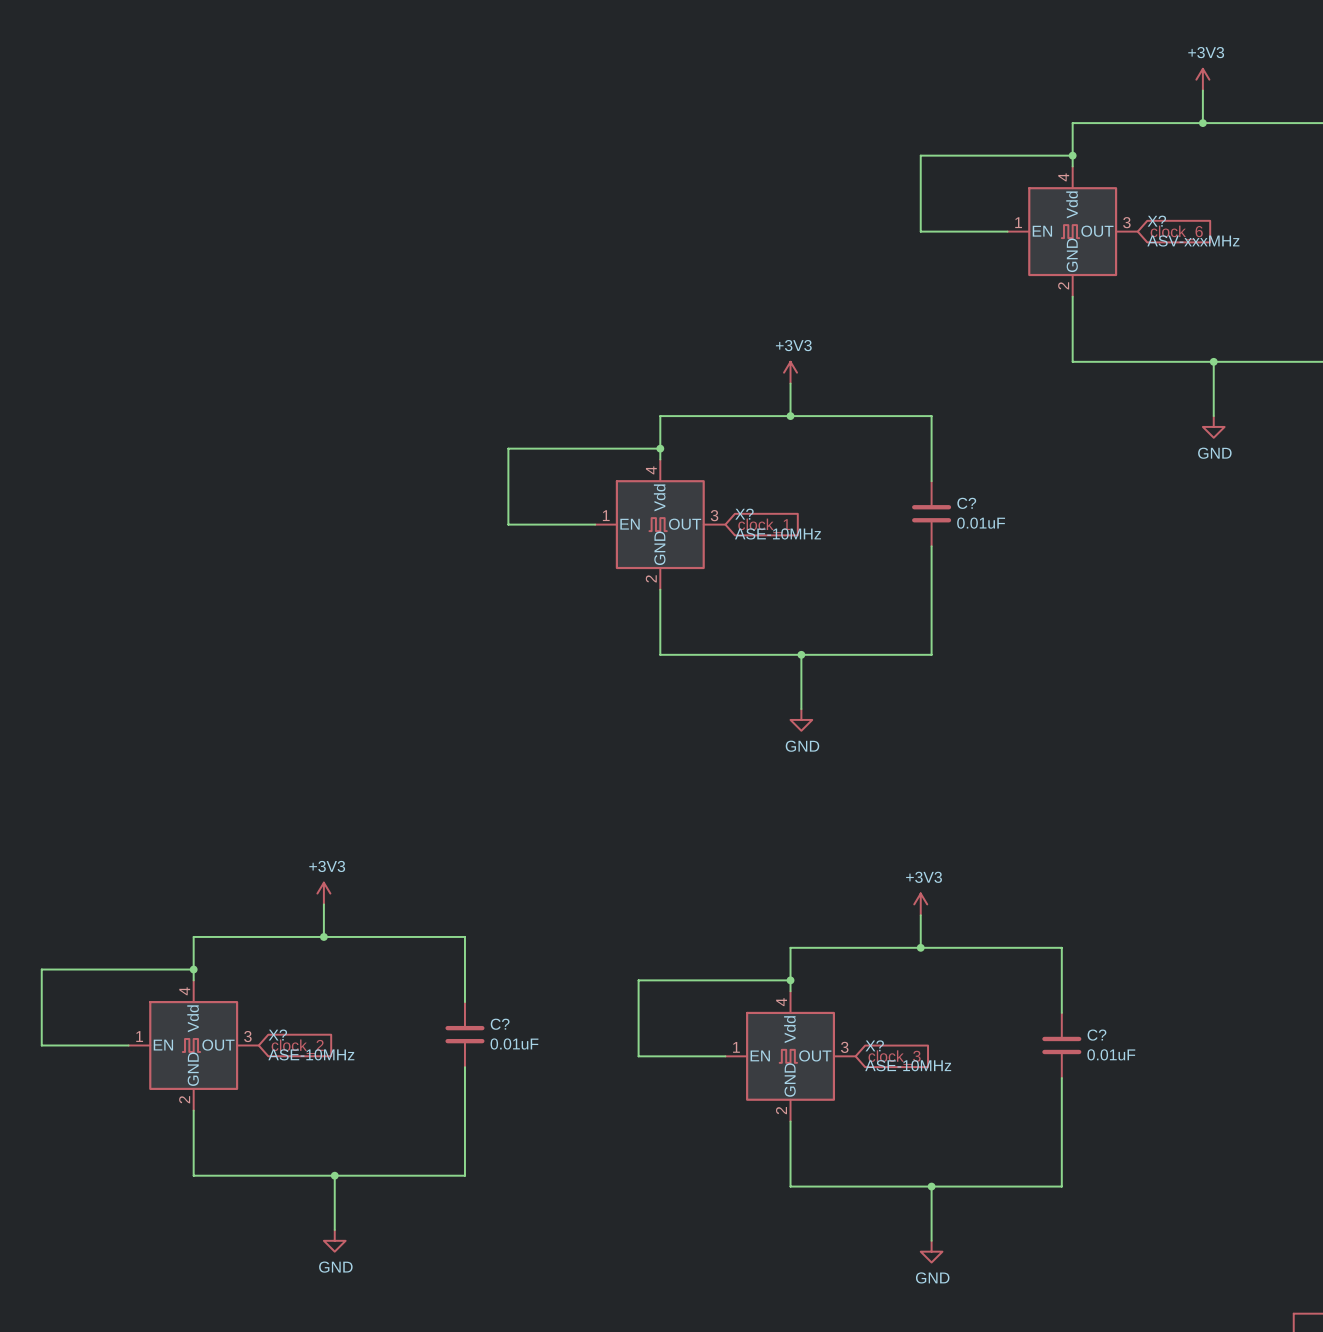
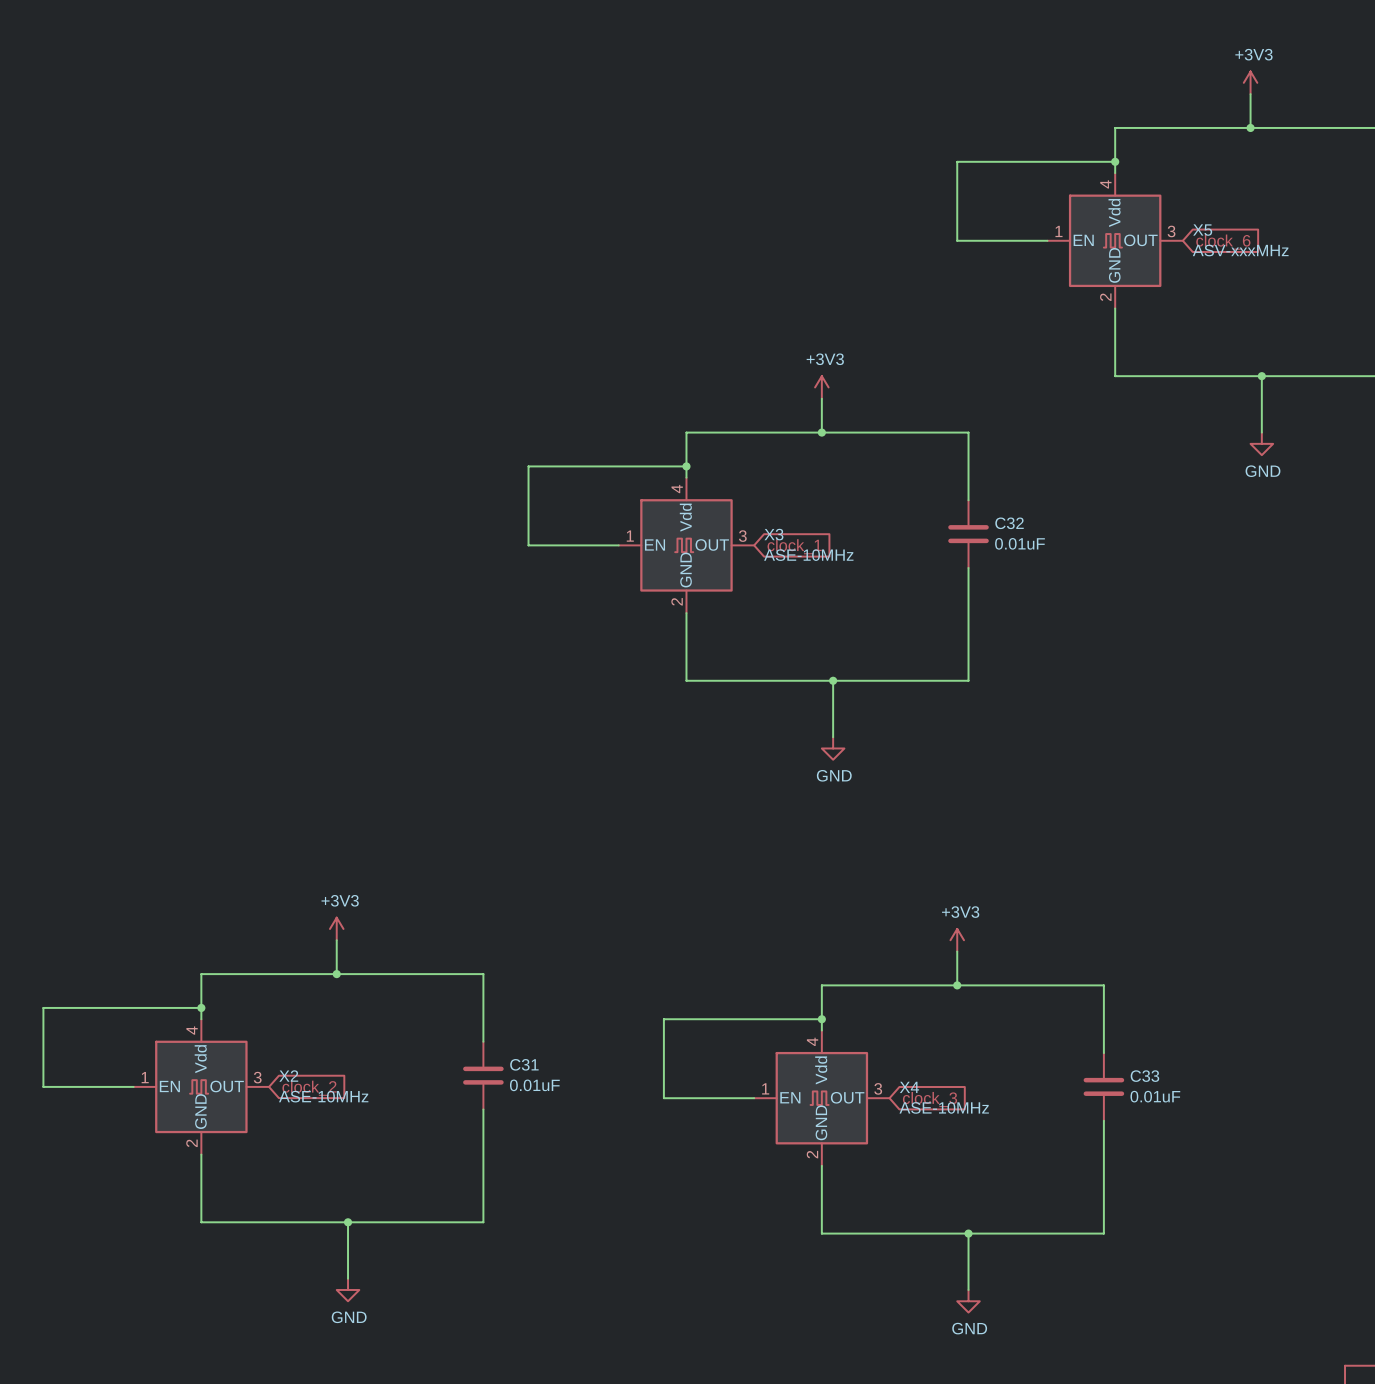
X? name: X? (1156, 221) -> X5 (1202, 230)
C? name: C? (966, 503) -> C32 (1009, 523)
X? name: X? (744, 514) -> X3 (773, 534)
C? name: C? (500, 1024) -> C31 (524, 1064)
X? name: X? (277, 1035) -> X2 (288, 1076)
C? name: C? (1096, 1035) -> C33 (1144, 1076)
X? name: X? (874, 1045) -> X4 (909, 1087)

